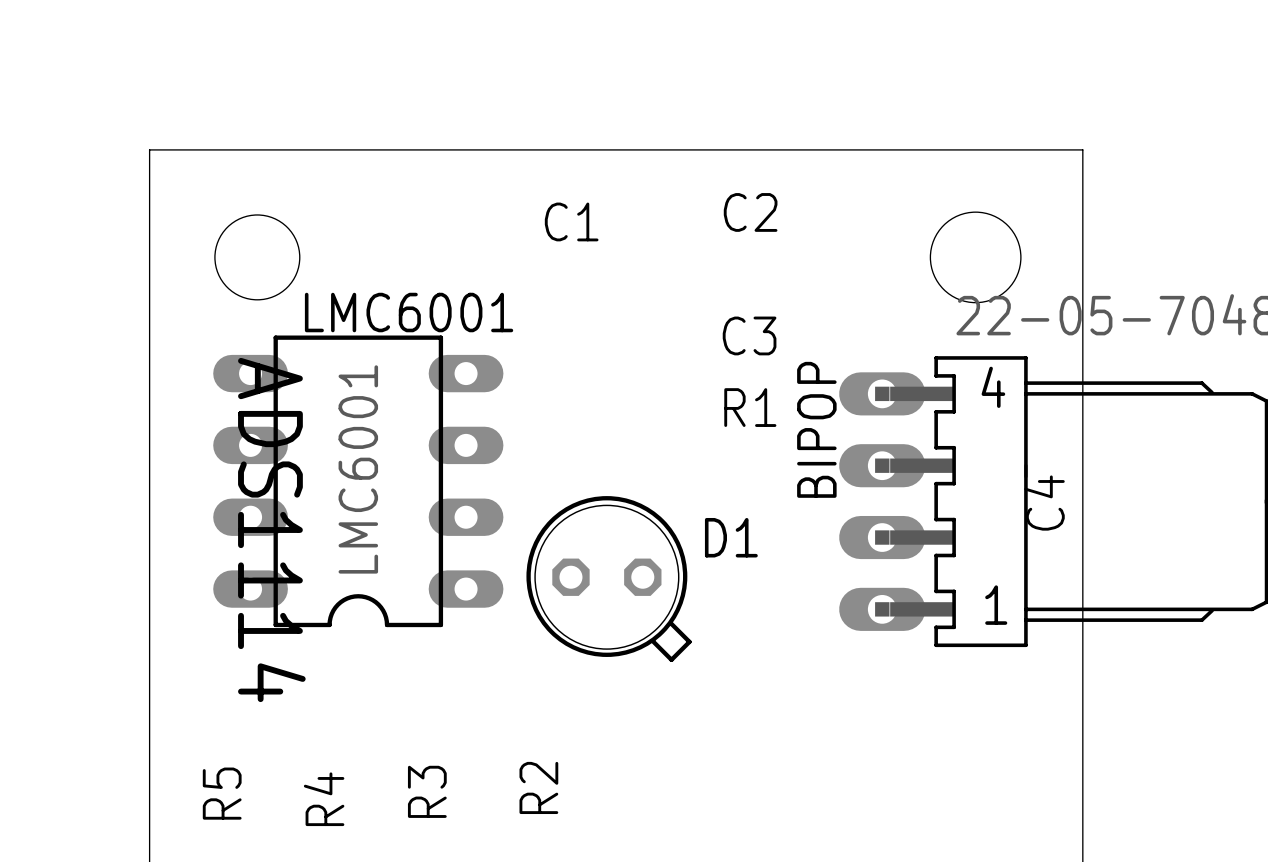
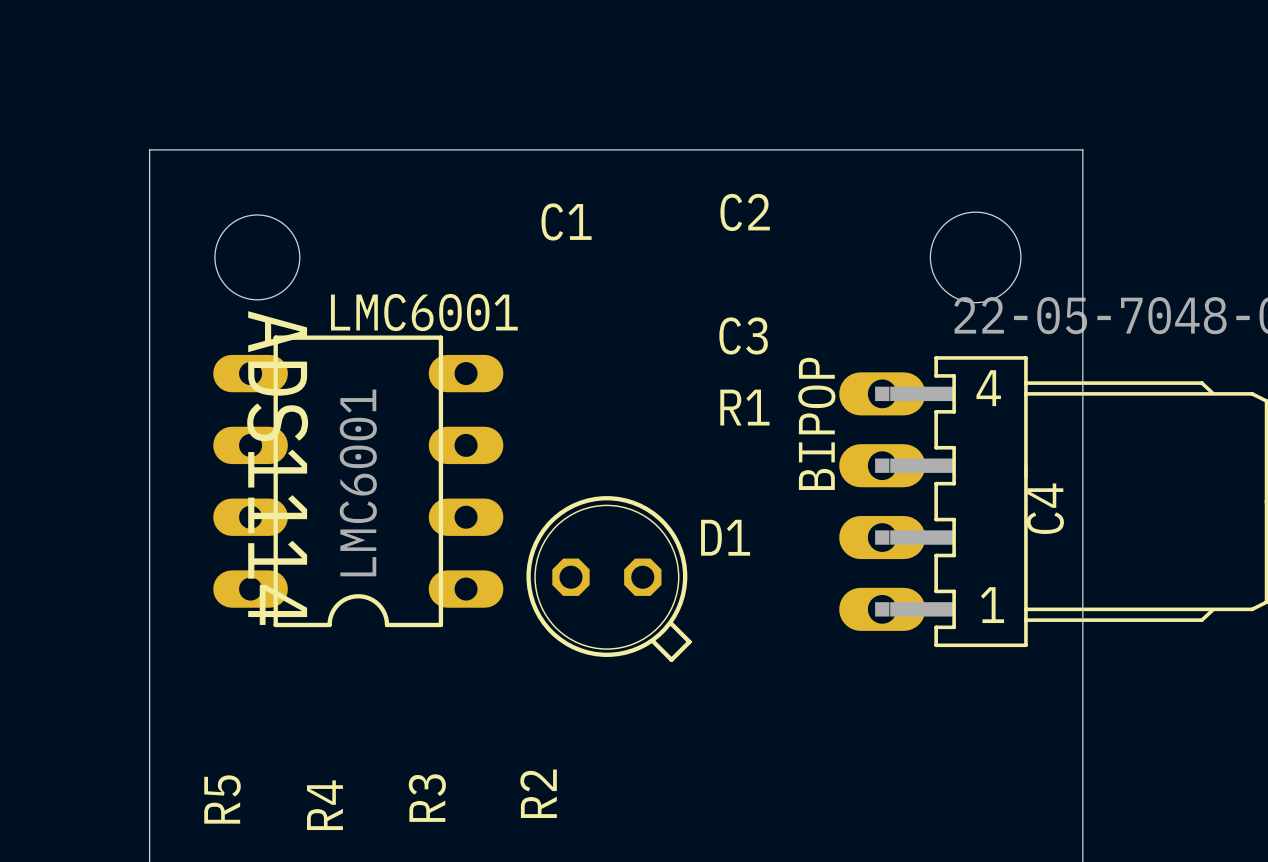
ADS1114 position: (271, 530) -> (277, 468)

